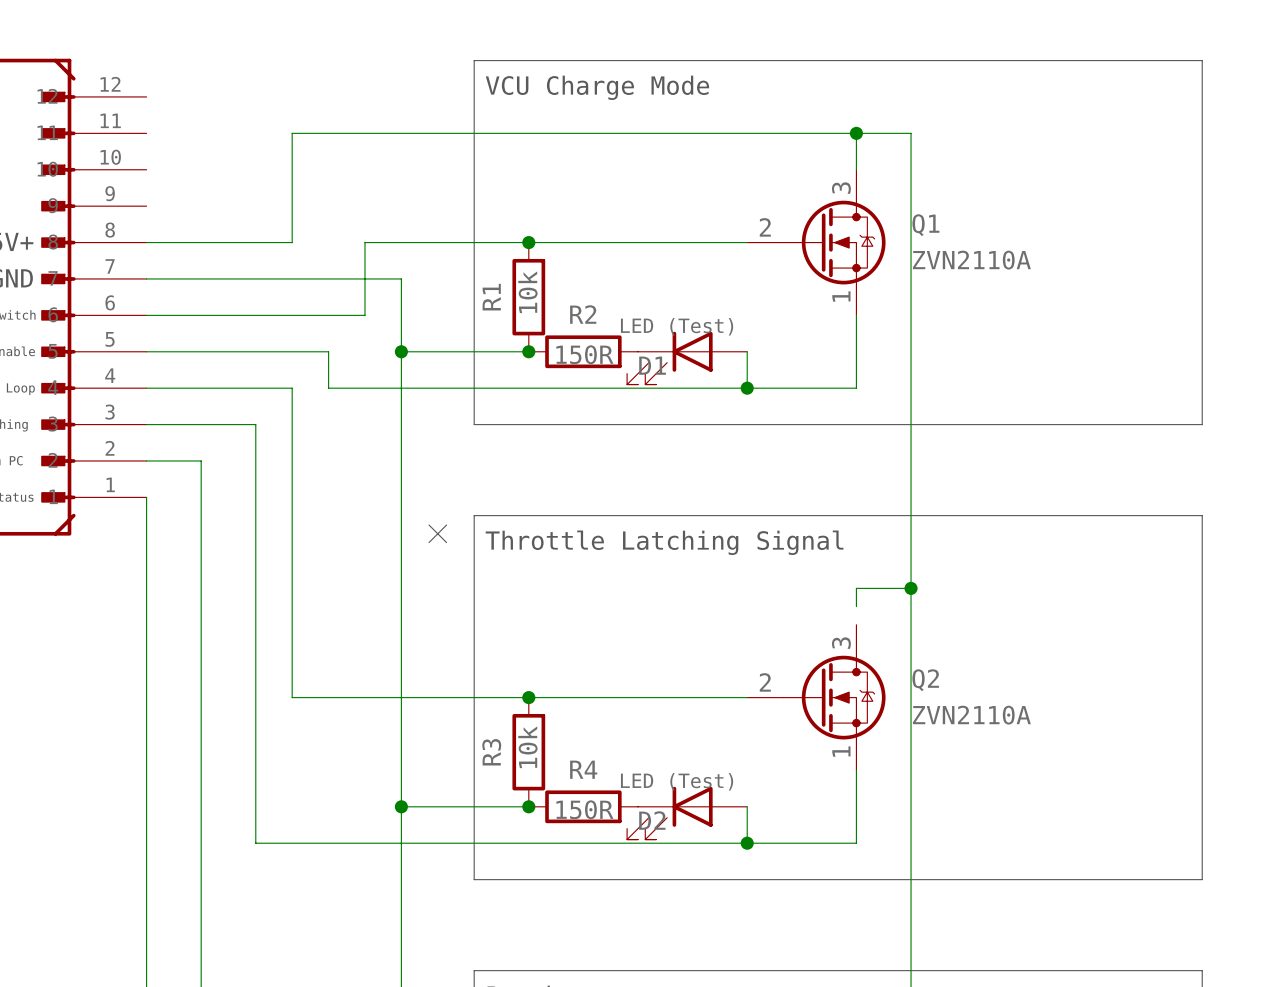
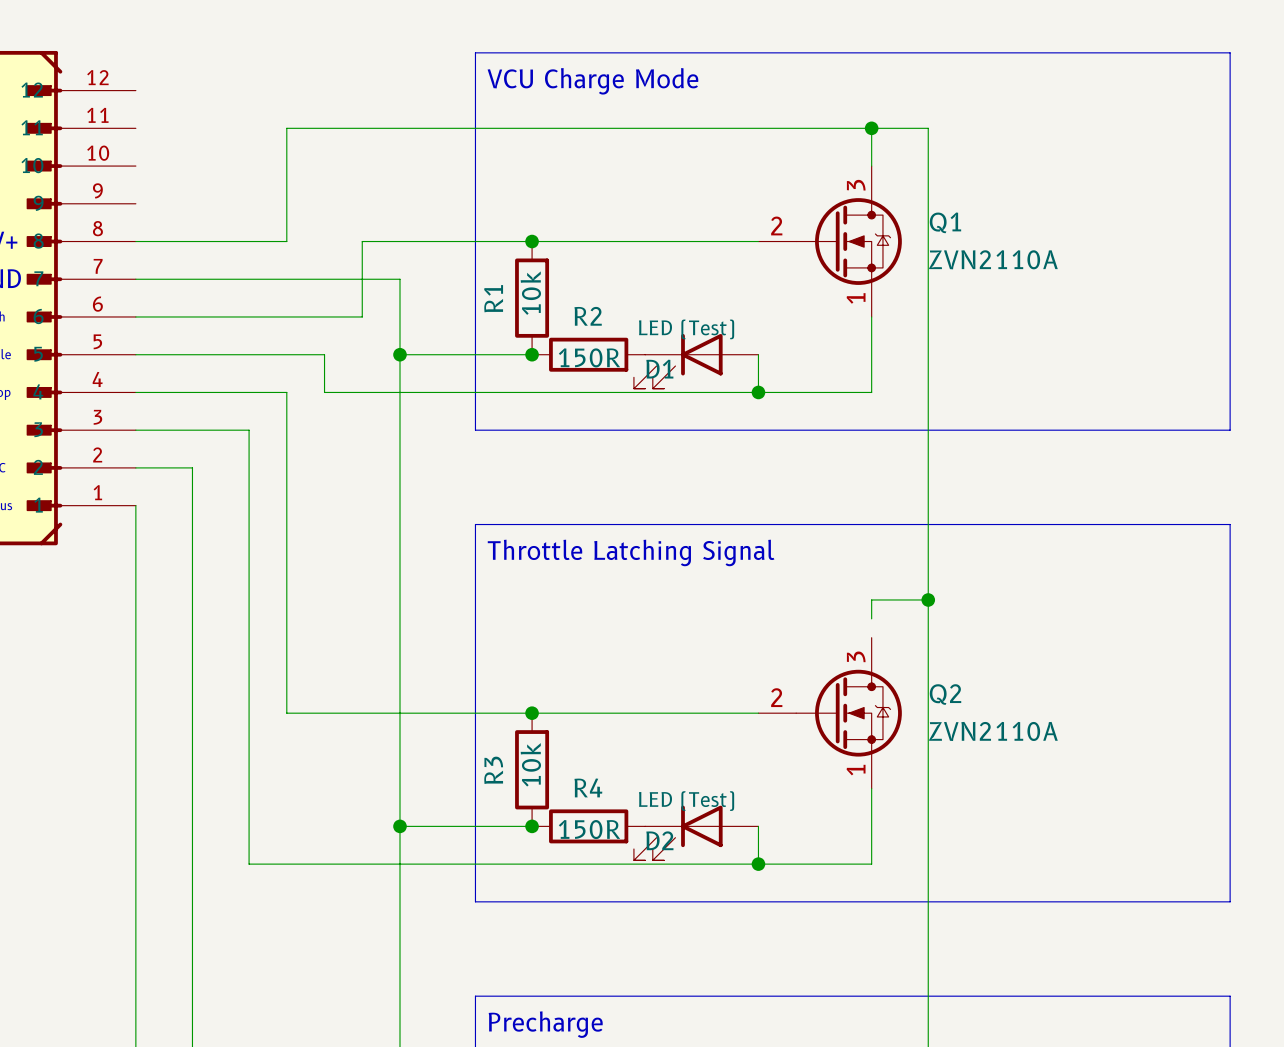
no-connect mark: (437, 533) -> none

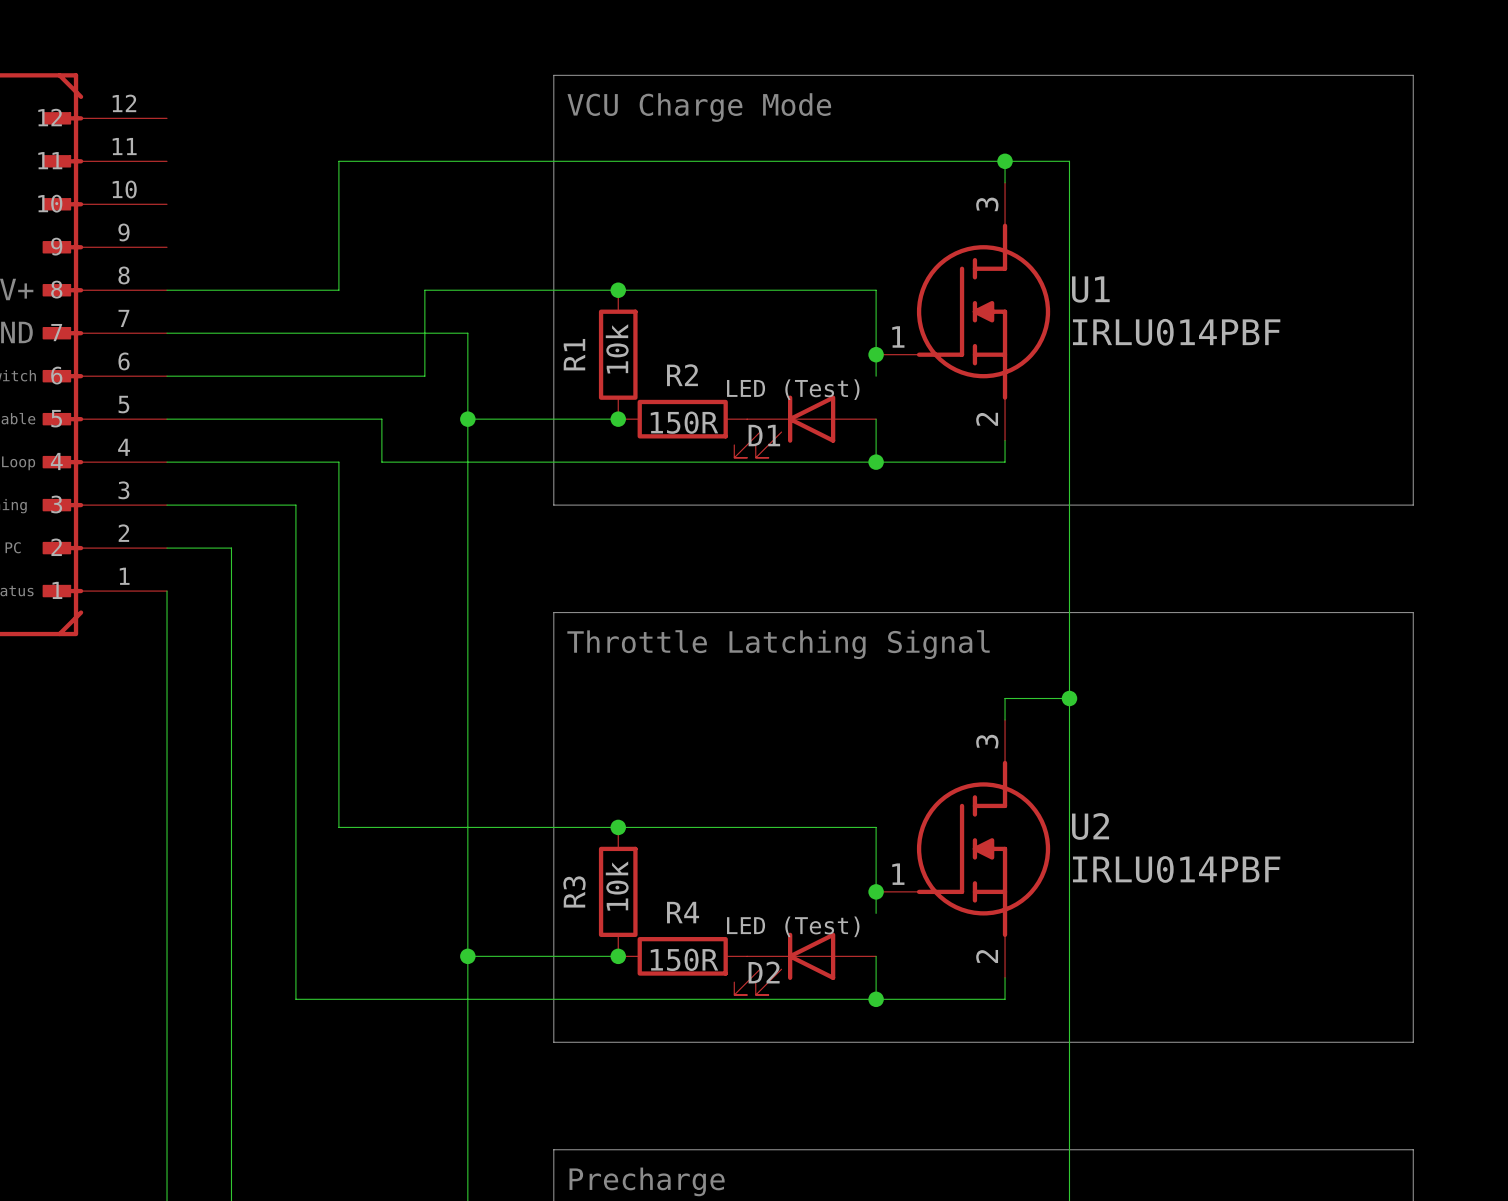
wire: none -> (876, 290) (876, 376)
Q1: ZVN2110A (830, 241) -> none
U1: none -> IRLU014PBF (963, 311)
junction: none -> (876, 354)
wire: none -> (876, 827) (876, 913)
Q2: ZVN2110A (830, 713) -> none
U2: none -> IRLU014PBF (963, 848)
junction: none -> (876, 891)

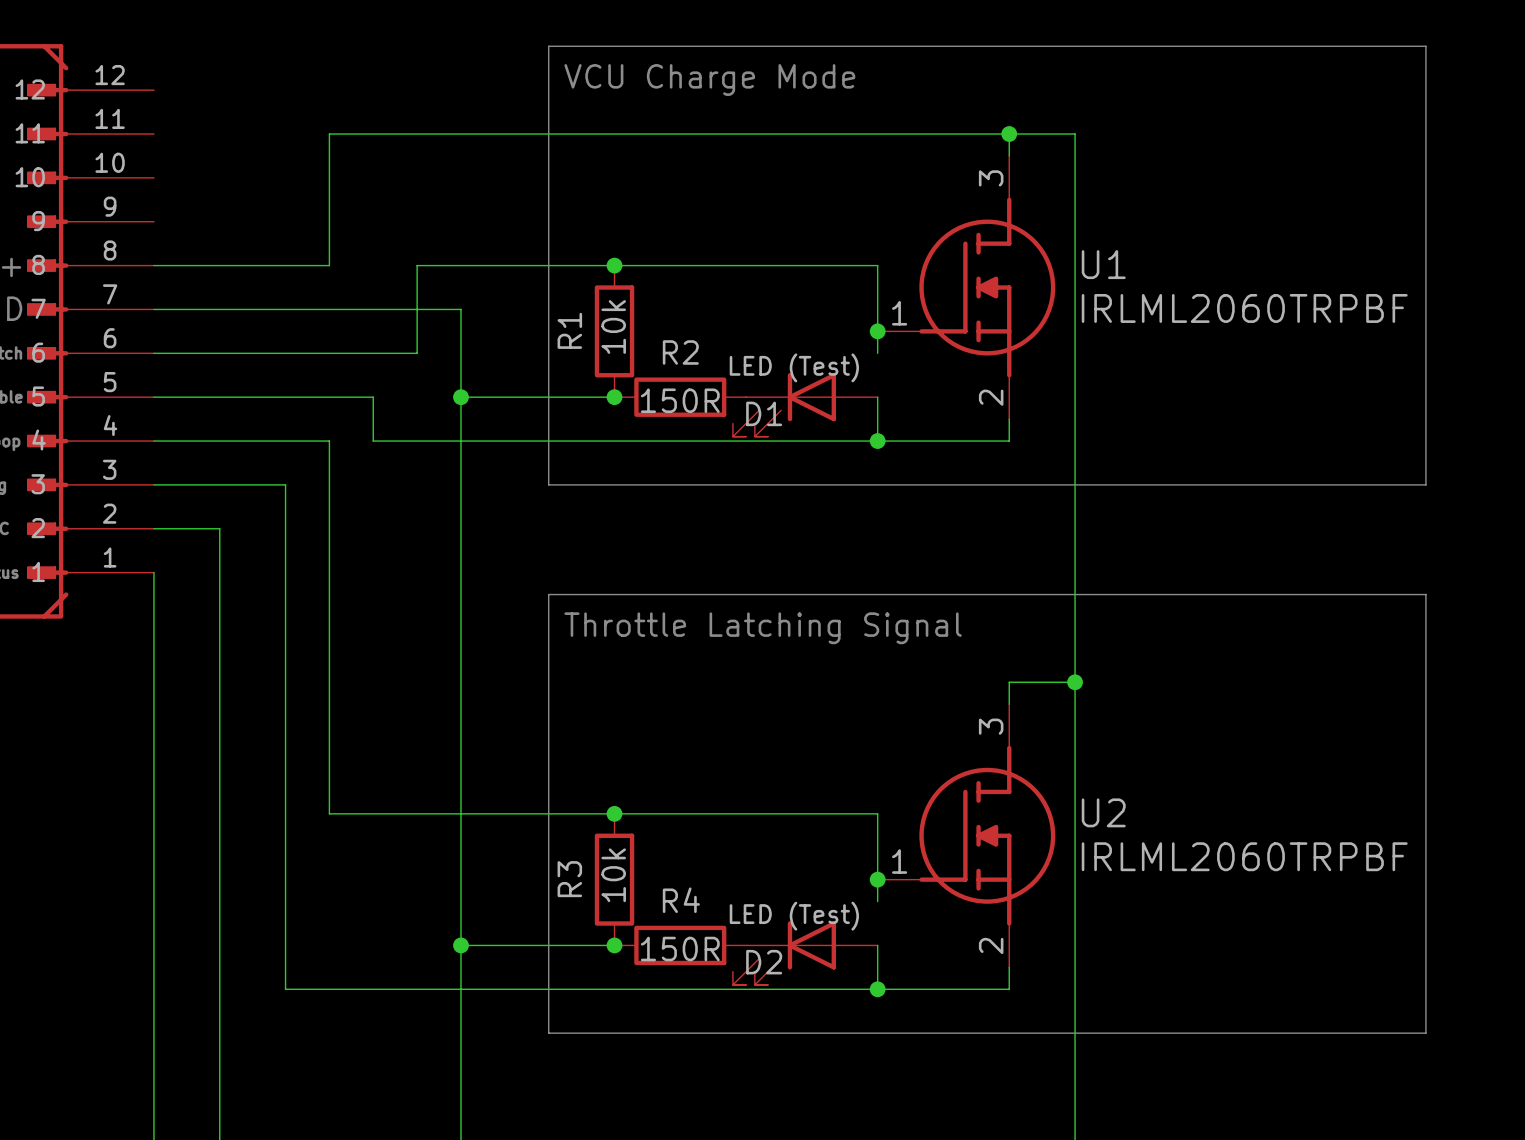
U1 value: IRLU014PBF (1176, 332) -> IRLML2060TRPBF (1244, 308)
U2 value: IRLU014PBF (1176, 869) -> IRLML2060TRPBF (1244, 856)

